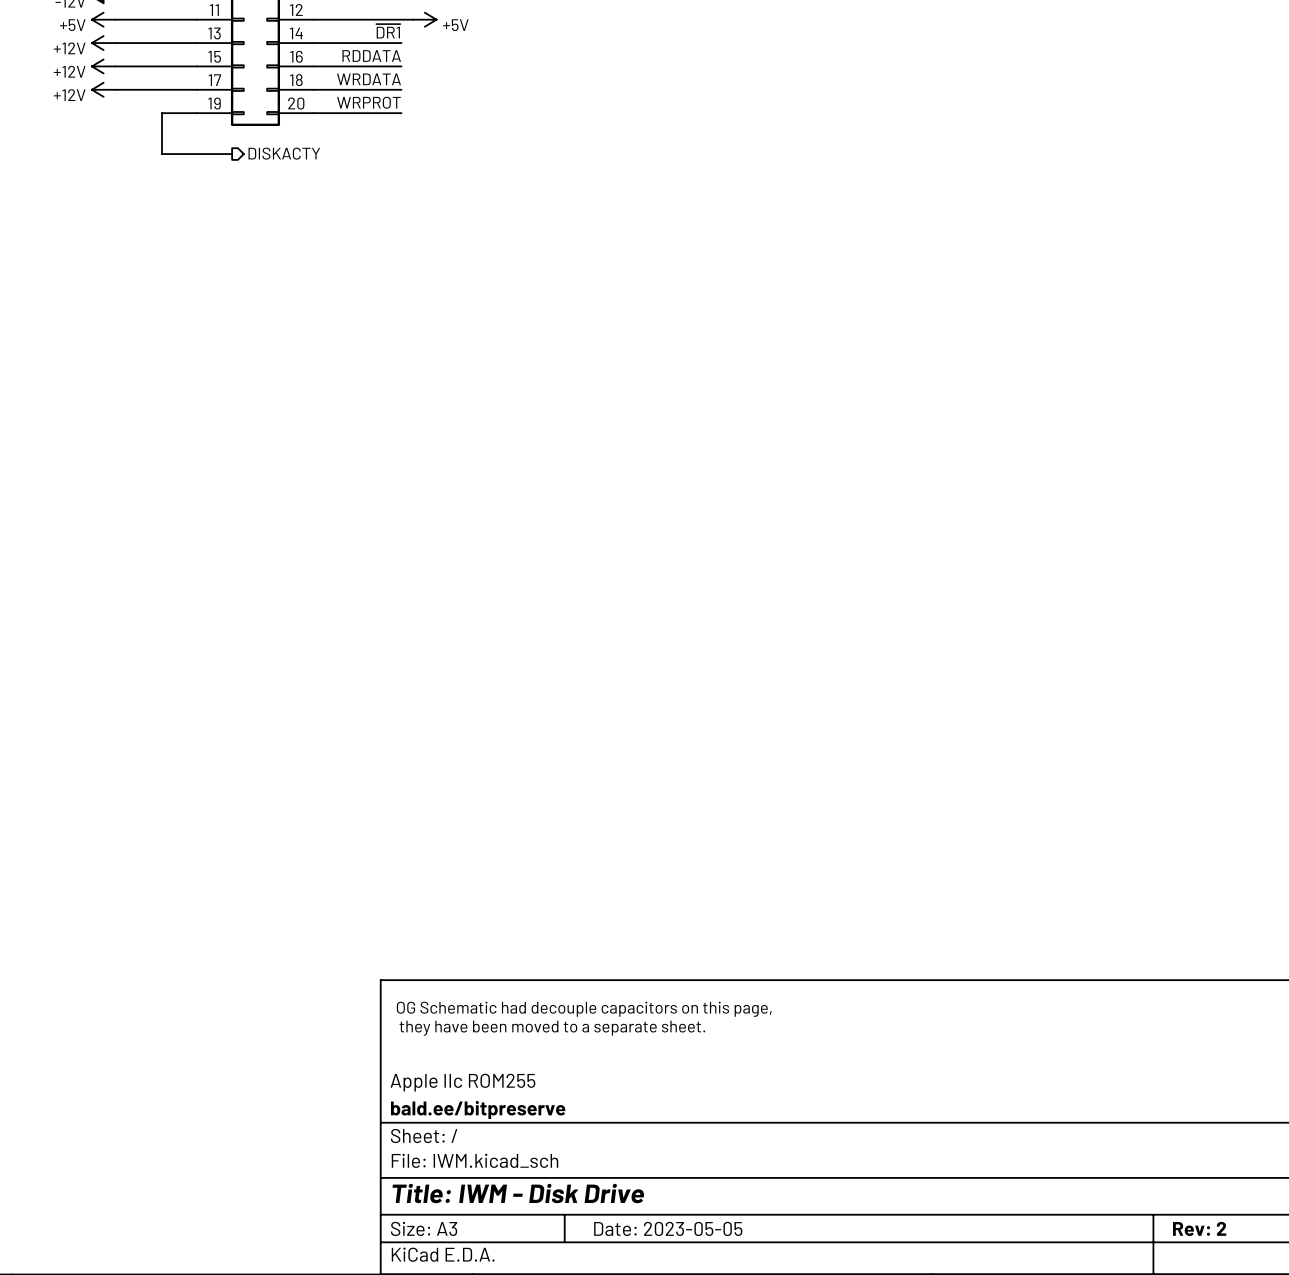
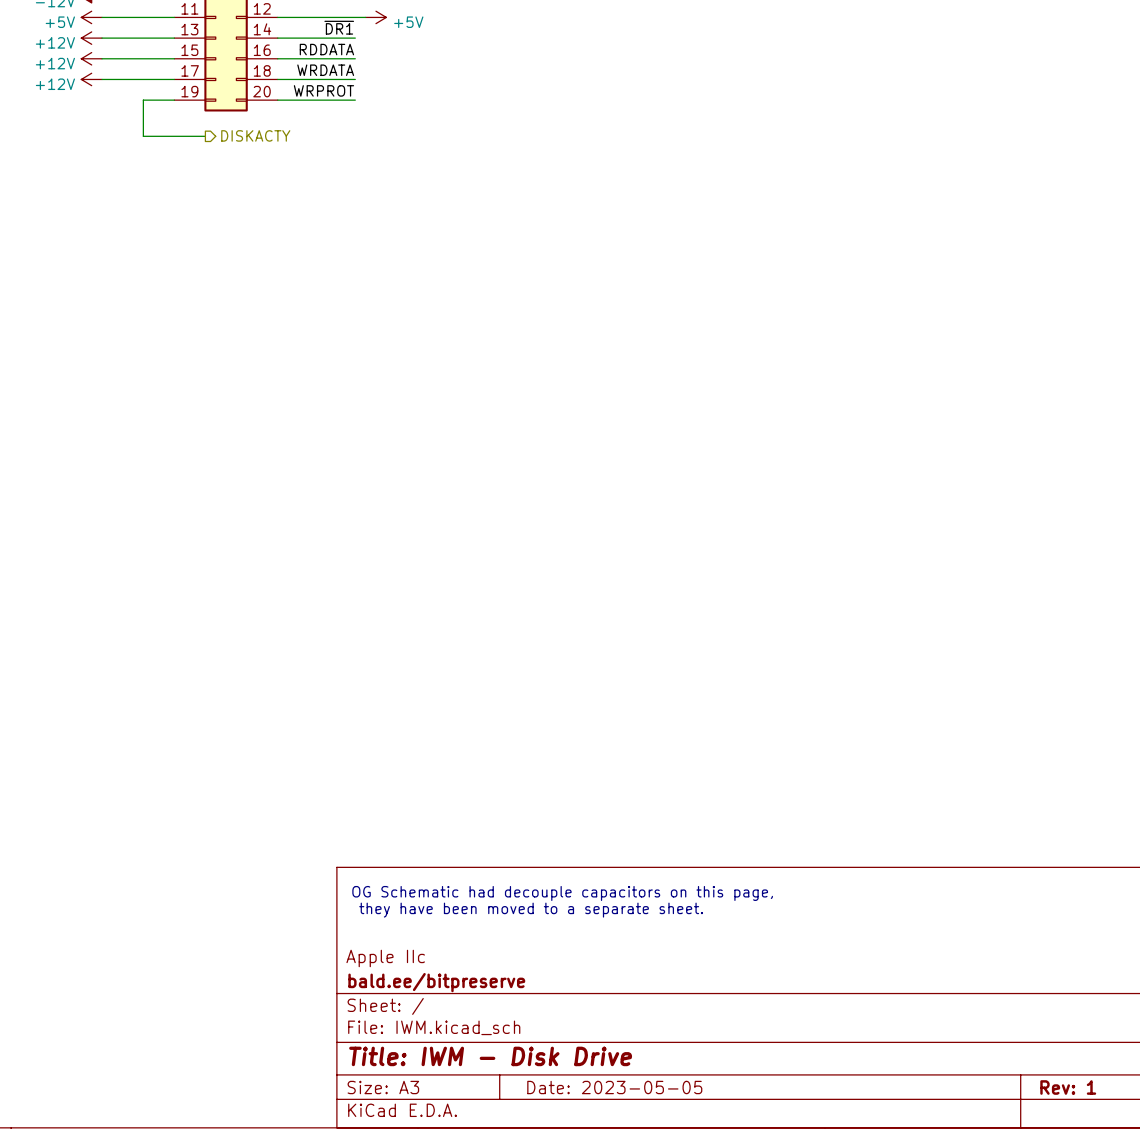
title block: Apple IIc ROM255 (462, 1082) -> Apple IIc (385, 958)
title block: Rev: 2 (1199, 1228) -> Rev: 1 (1068, 1087)

